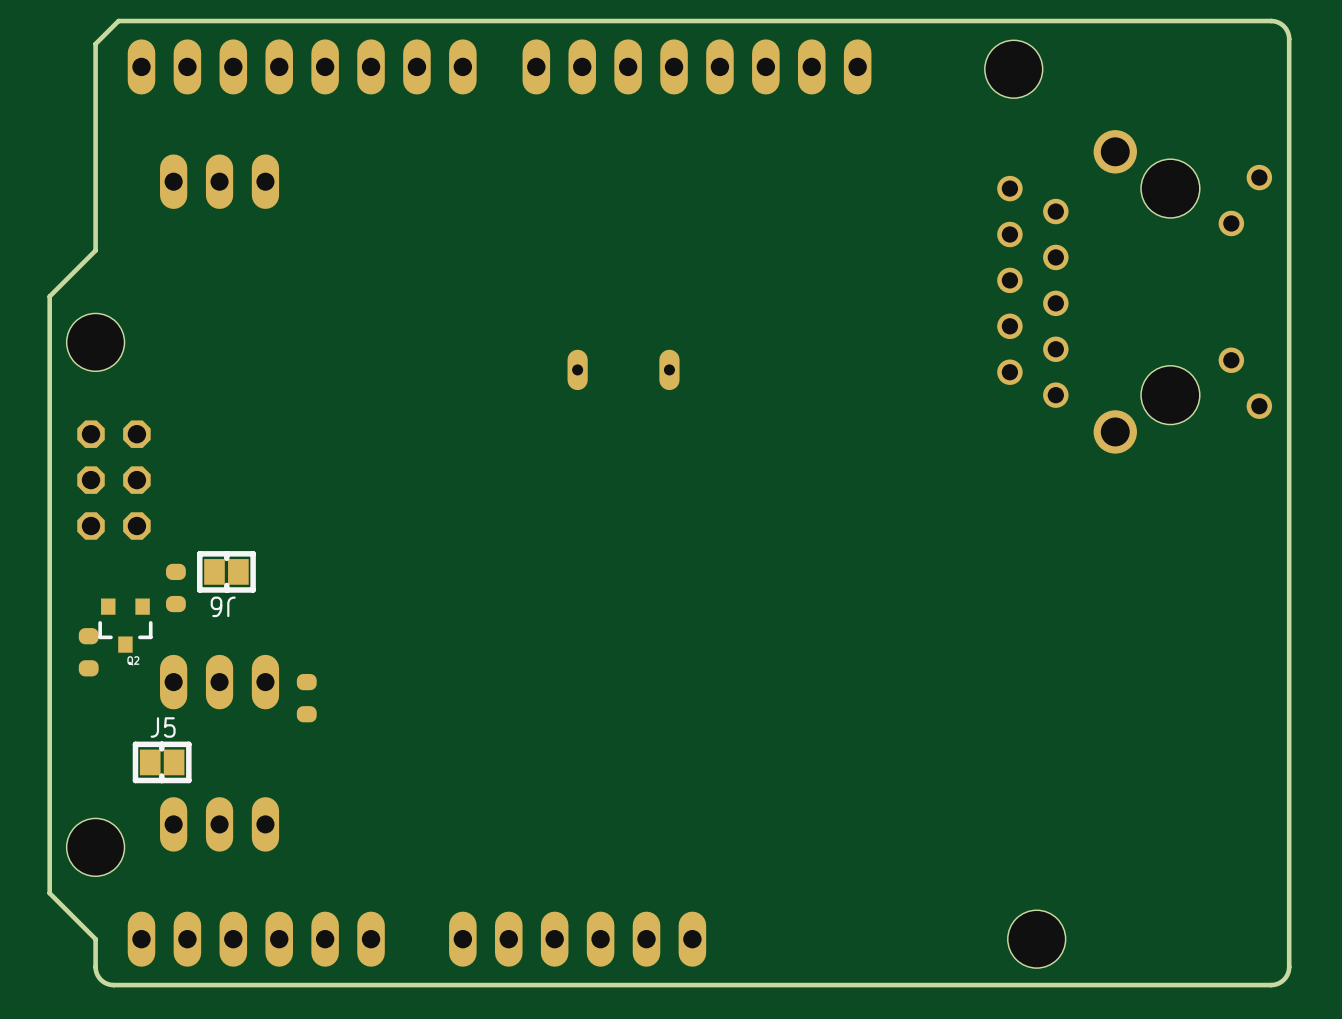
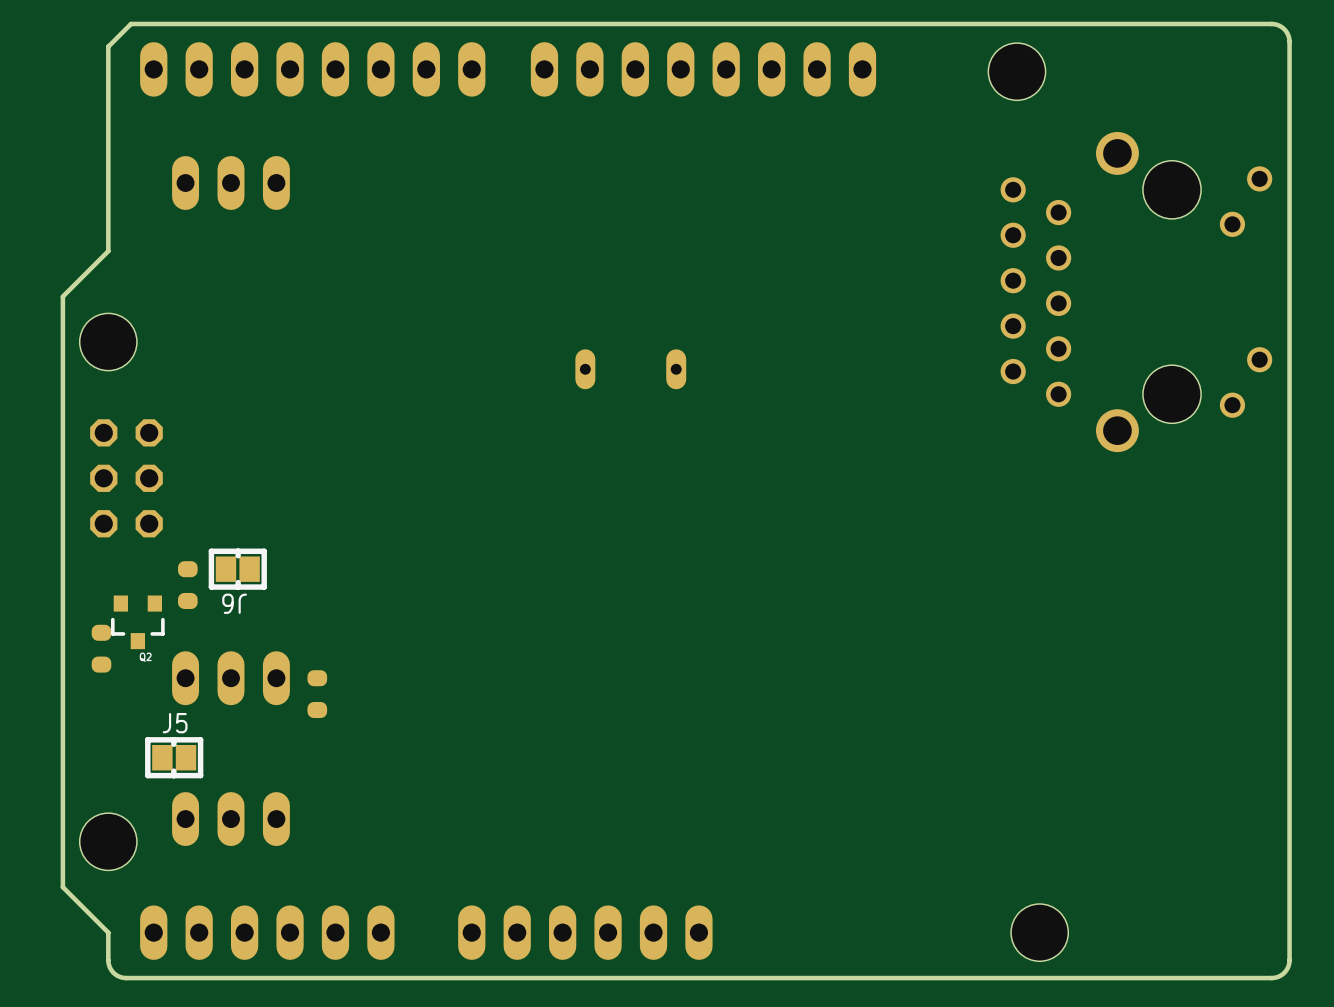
part footprint: [997, 130, 1273, 454] -> [1000, 131, 1273, 453]

